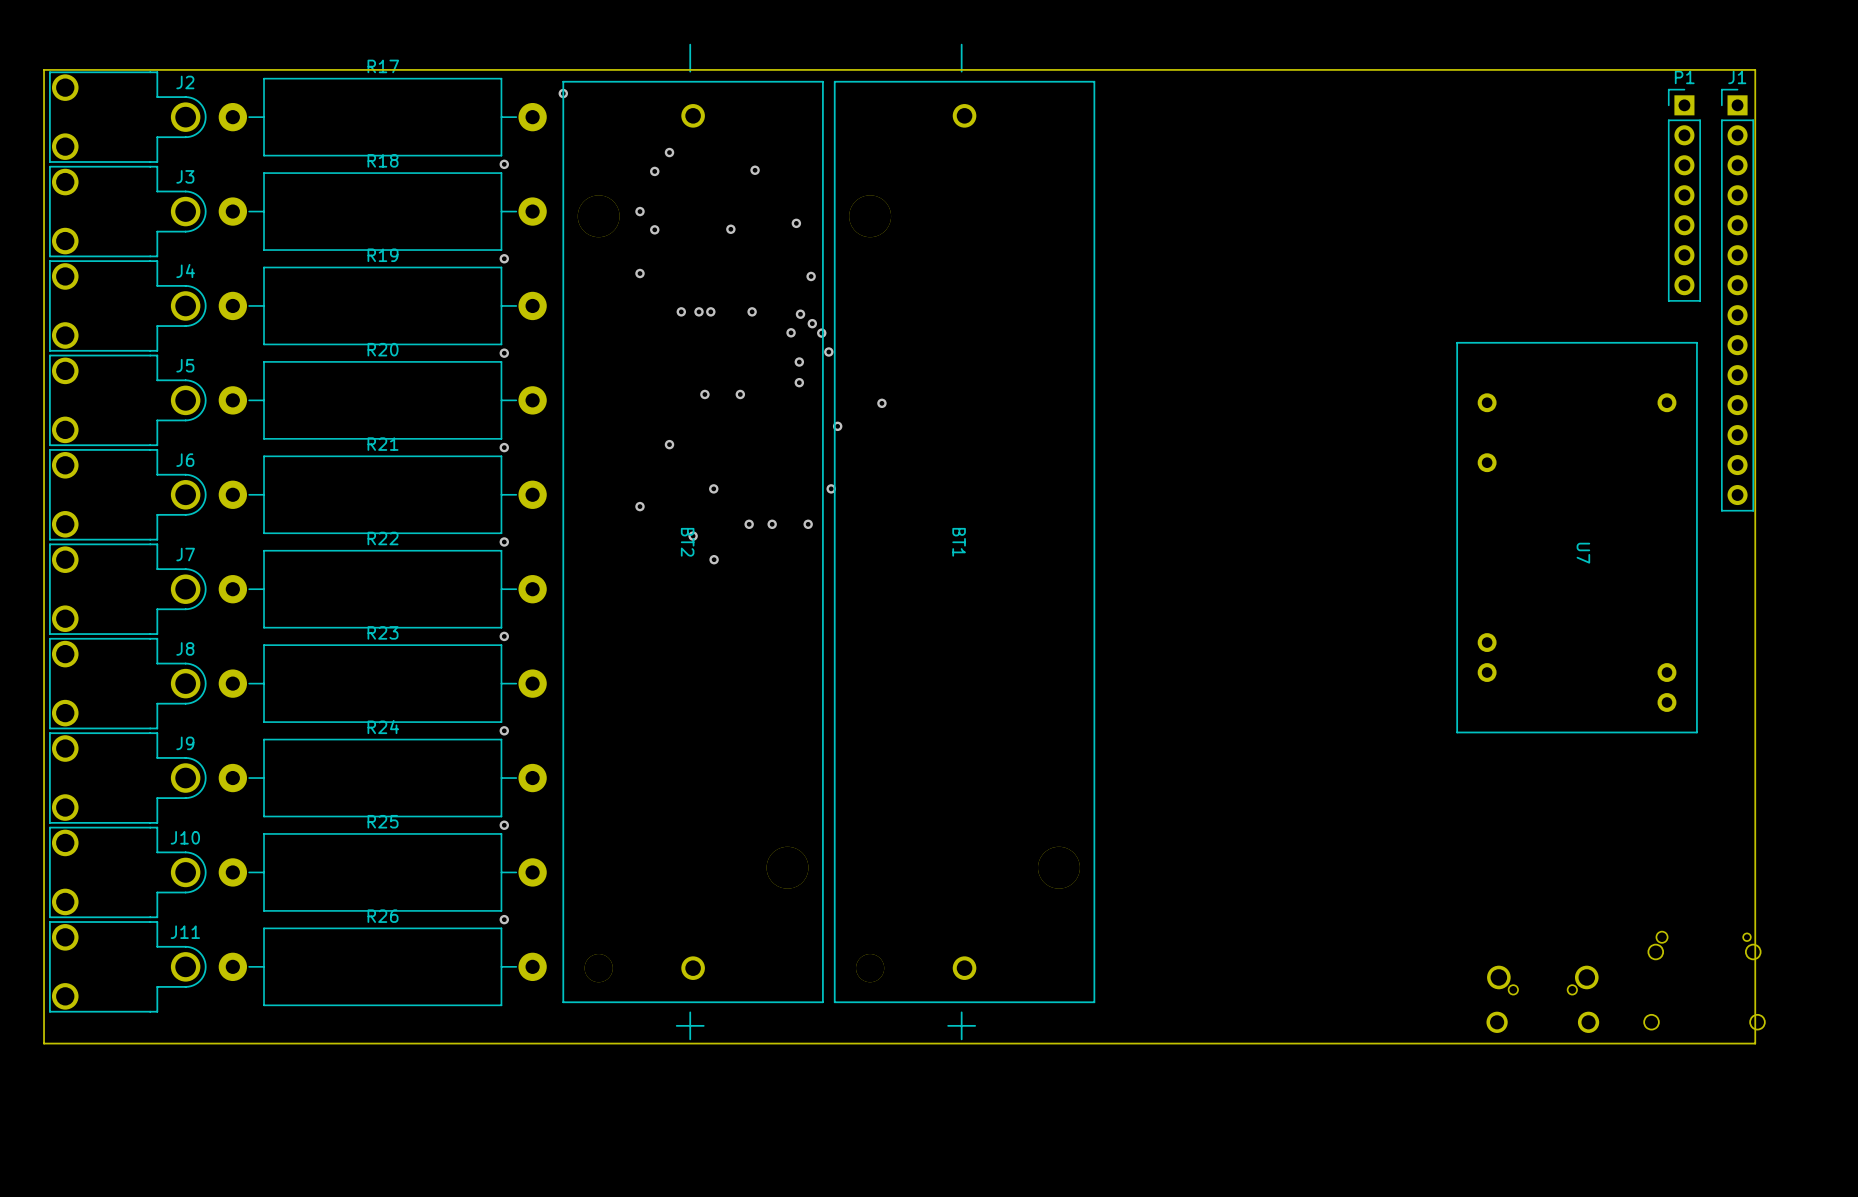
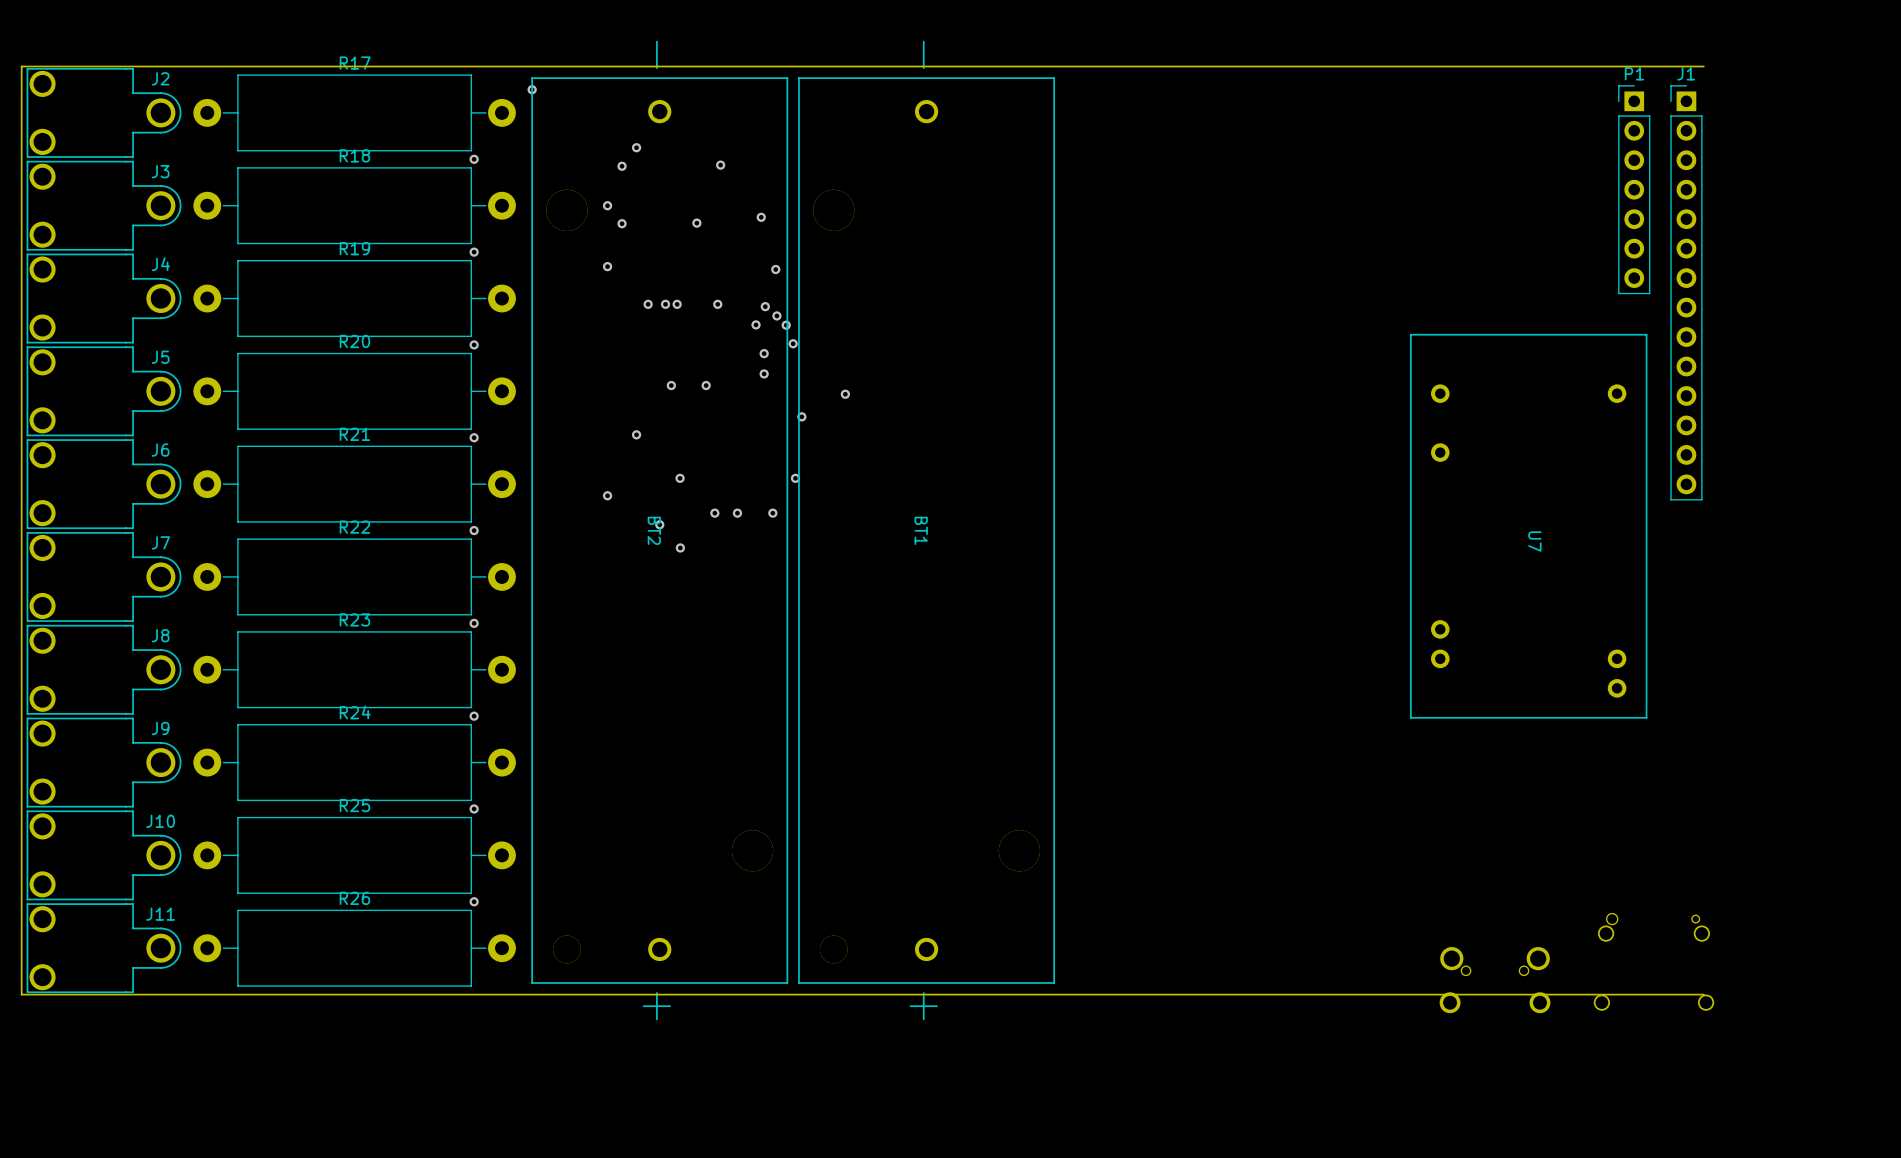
board edge: (1755, 69) (1755, 1043) (44, 1043) (44, 1014) -> (1703, 994) (21, 994)

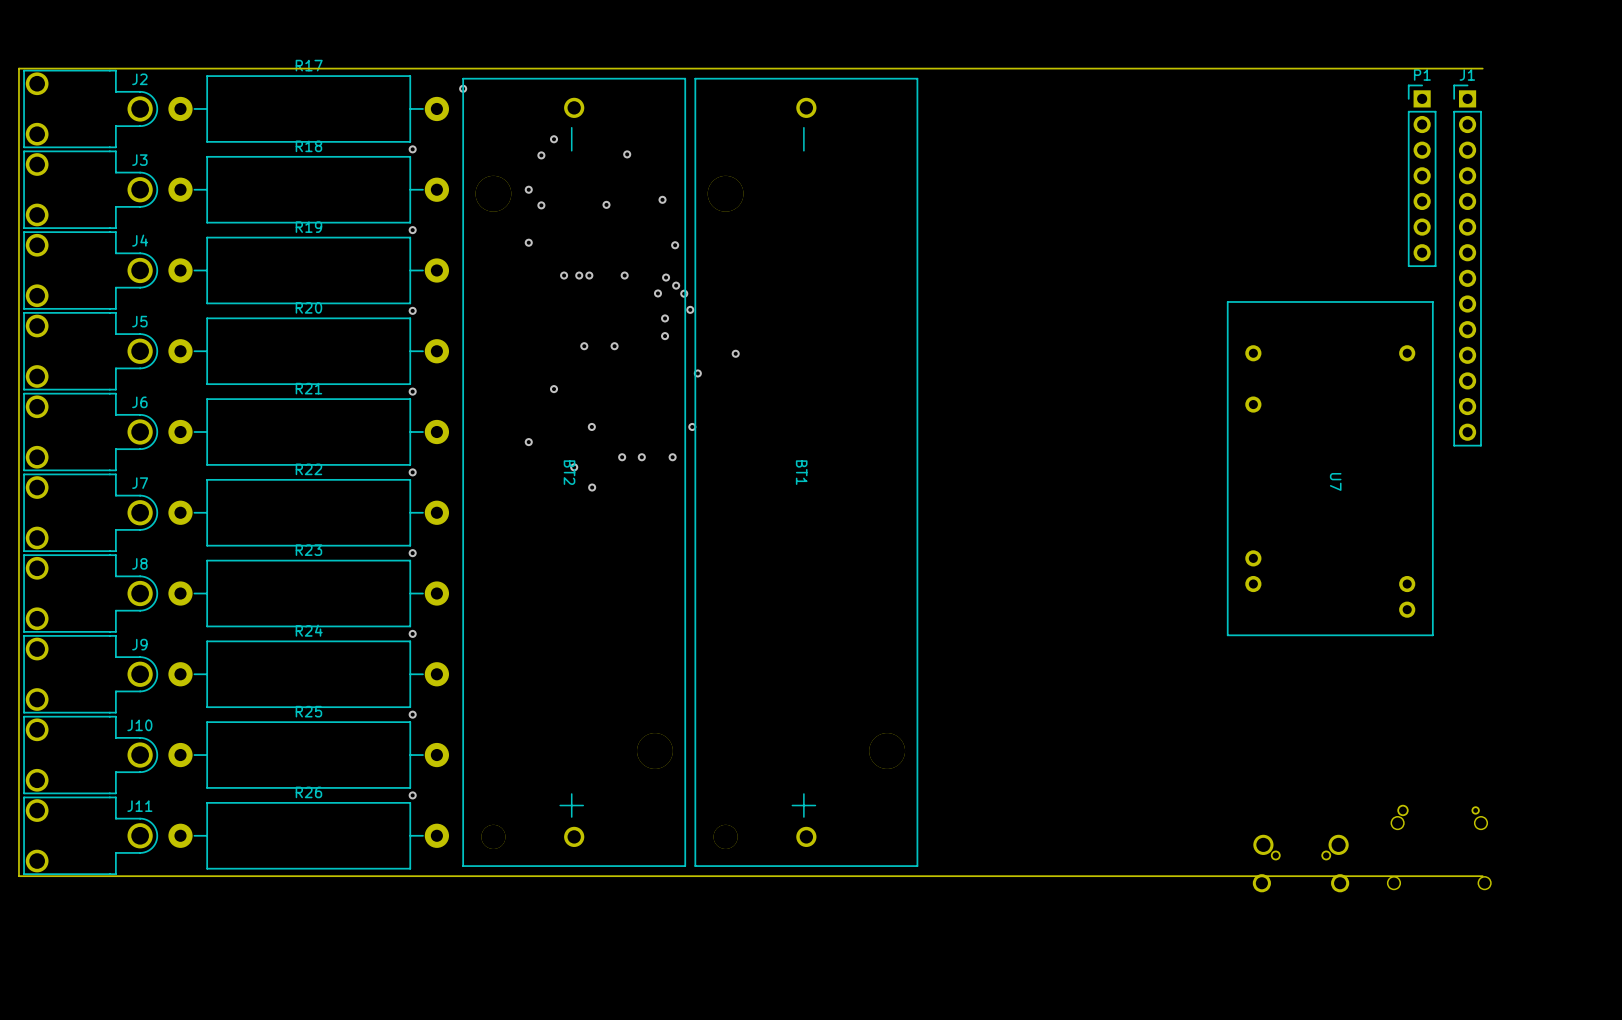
BT2 text position: - (656, 54) -> - (571, 139)
BT1 text position: - (923, 54) -> - (803, 139)
BT2 text position: + (656, 1006) -> + (571, 805)
BT1 text position: + (923, 1006) -> + (803, 805)

